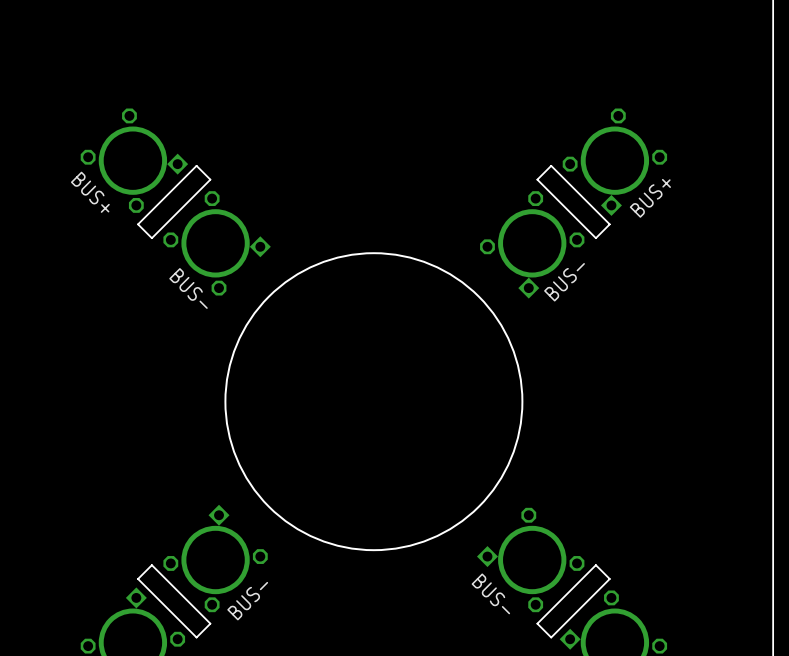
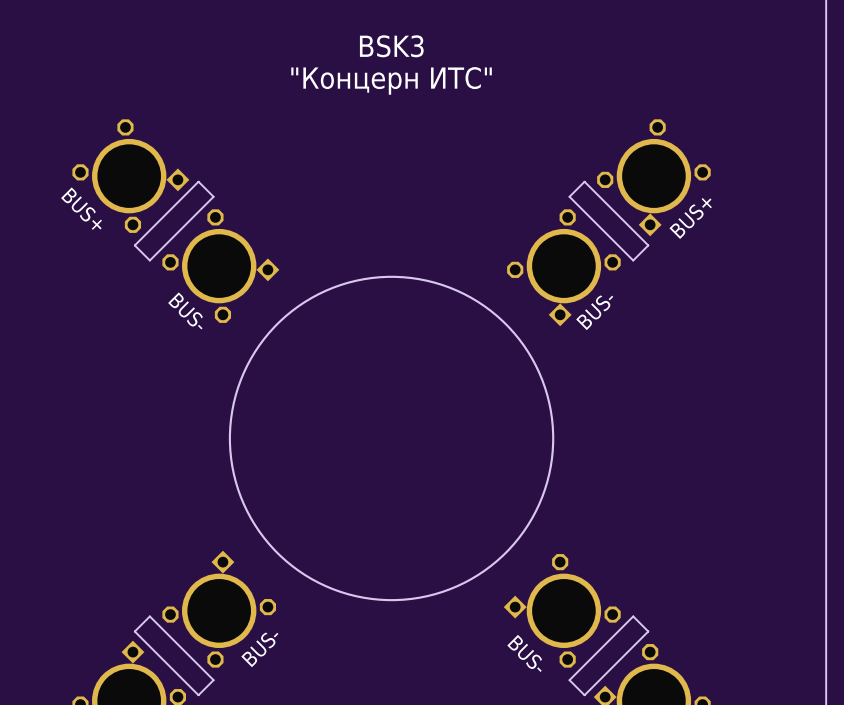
text: none -> BSK3 (391, 46)
text: none -> "Концерн ИТС" (391, 80)

